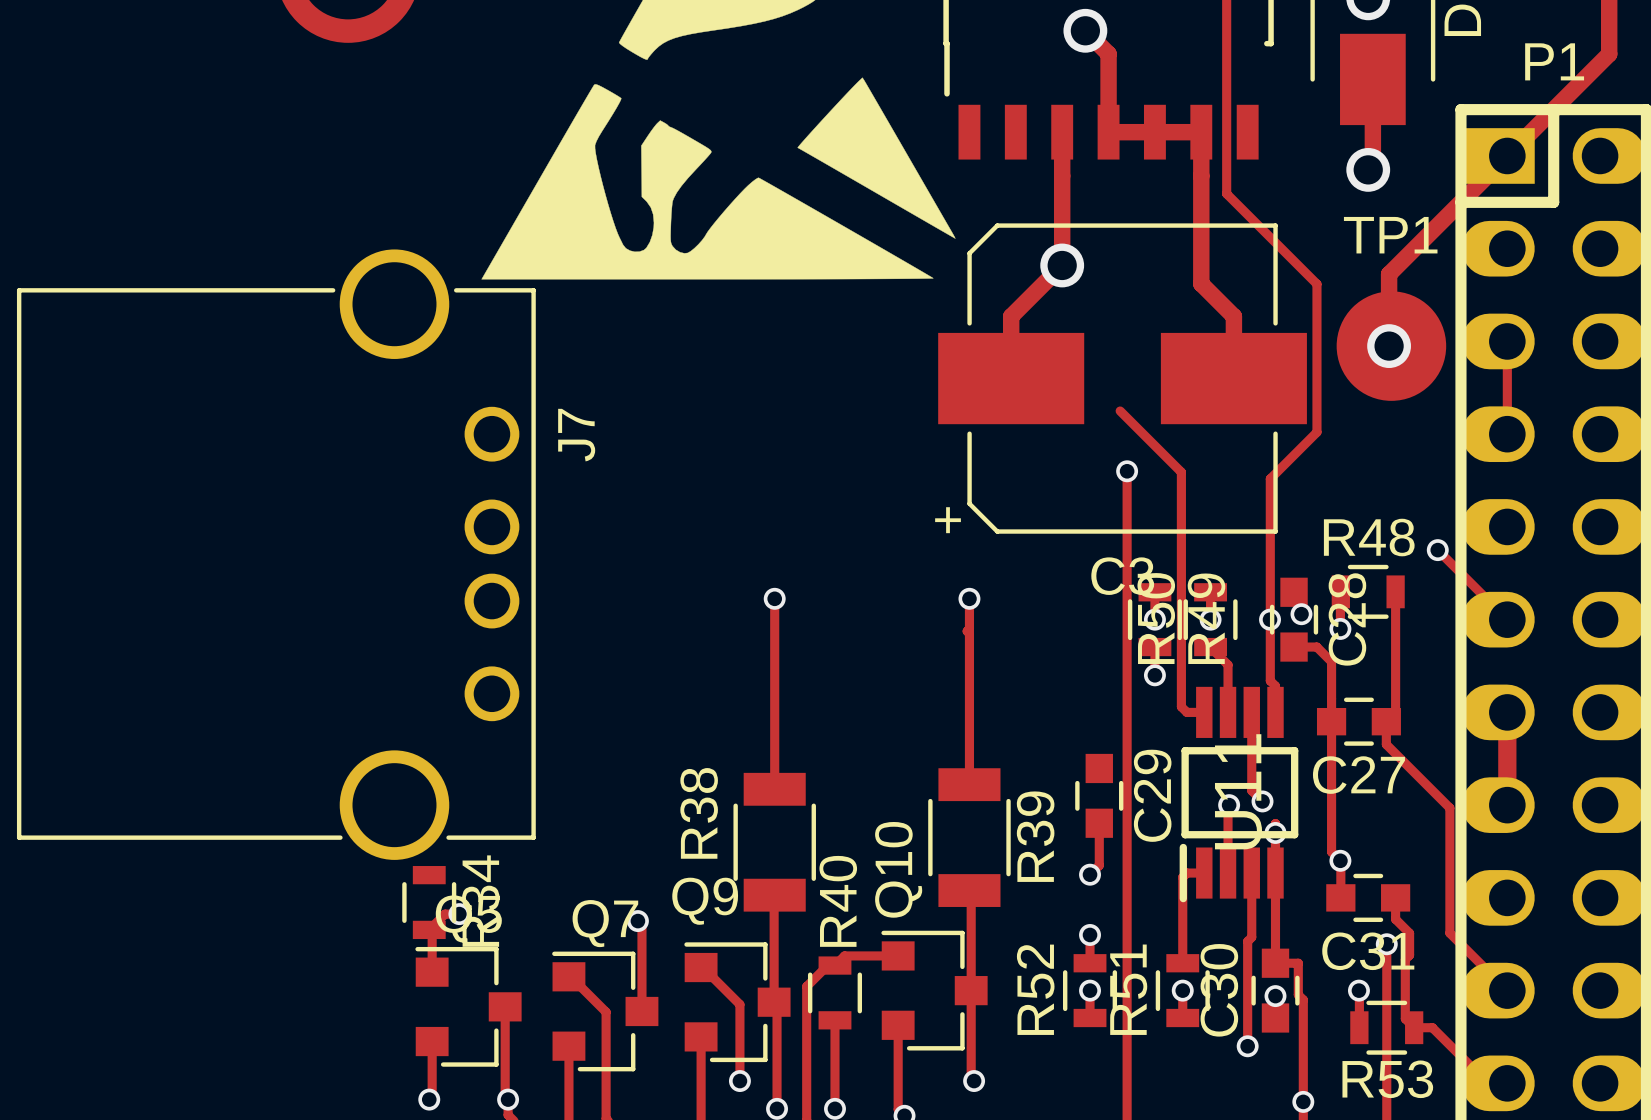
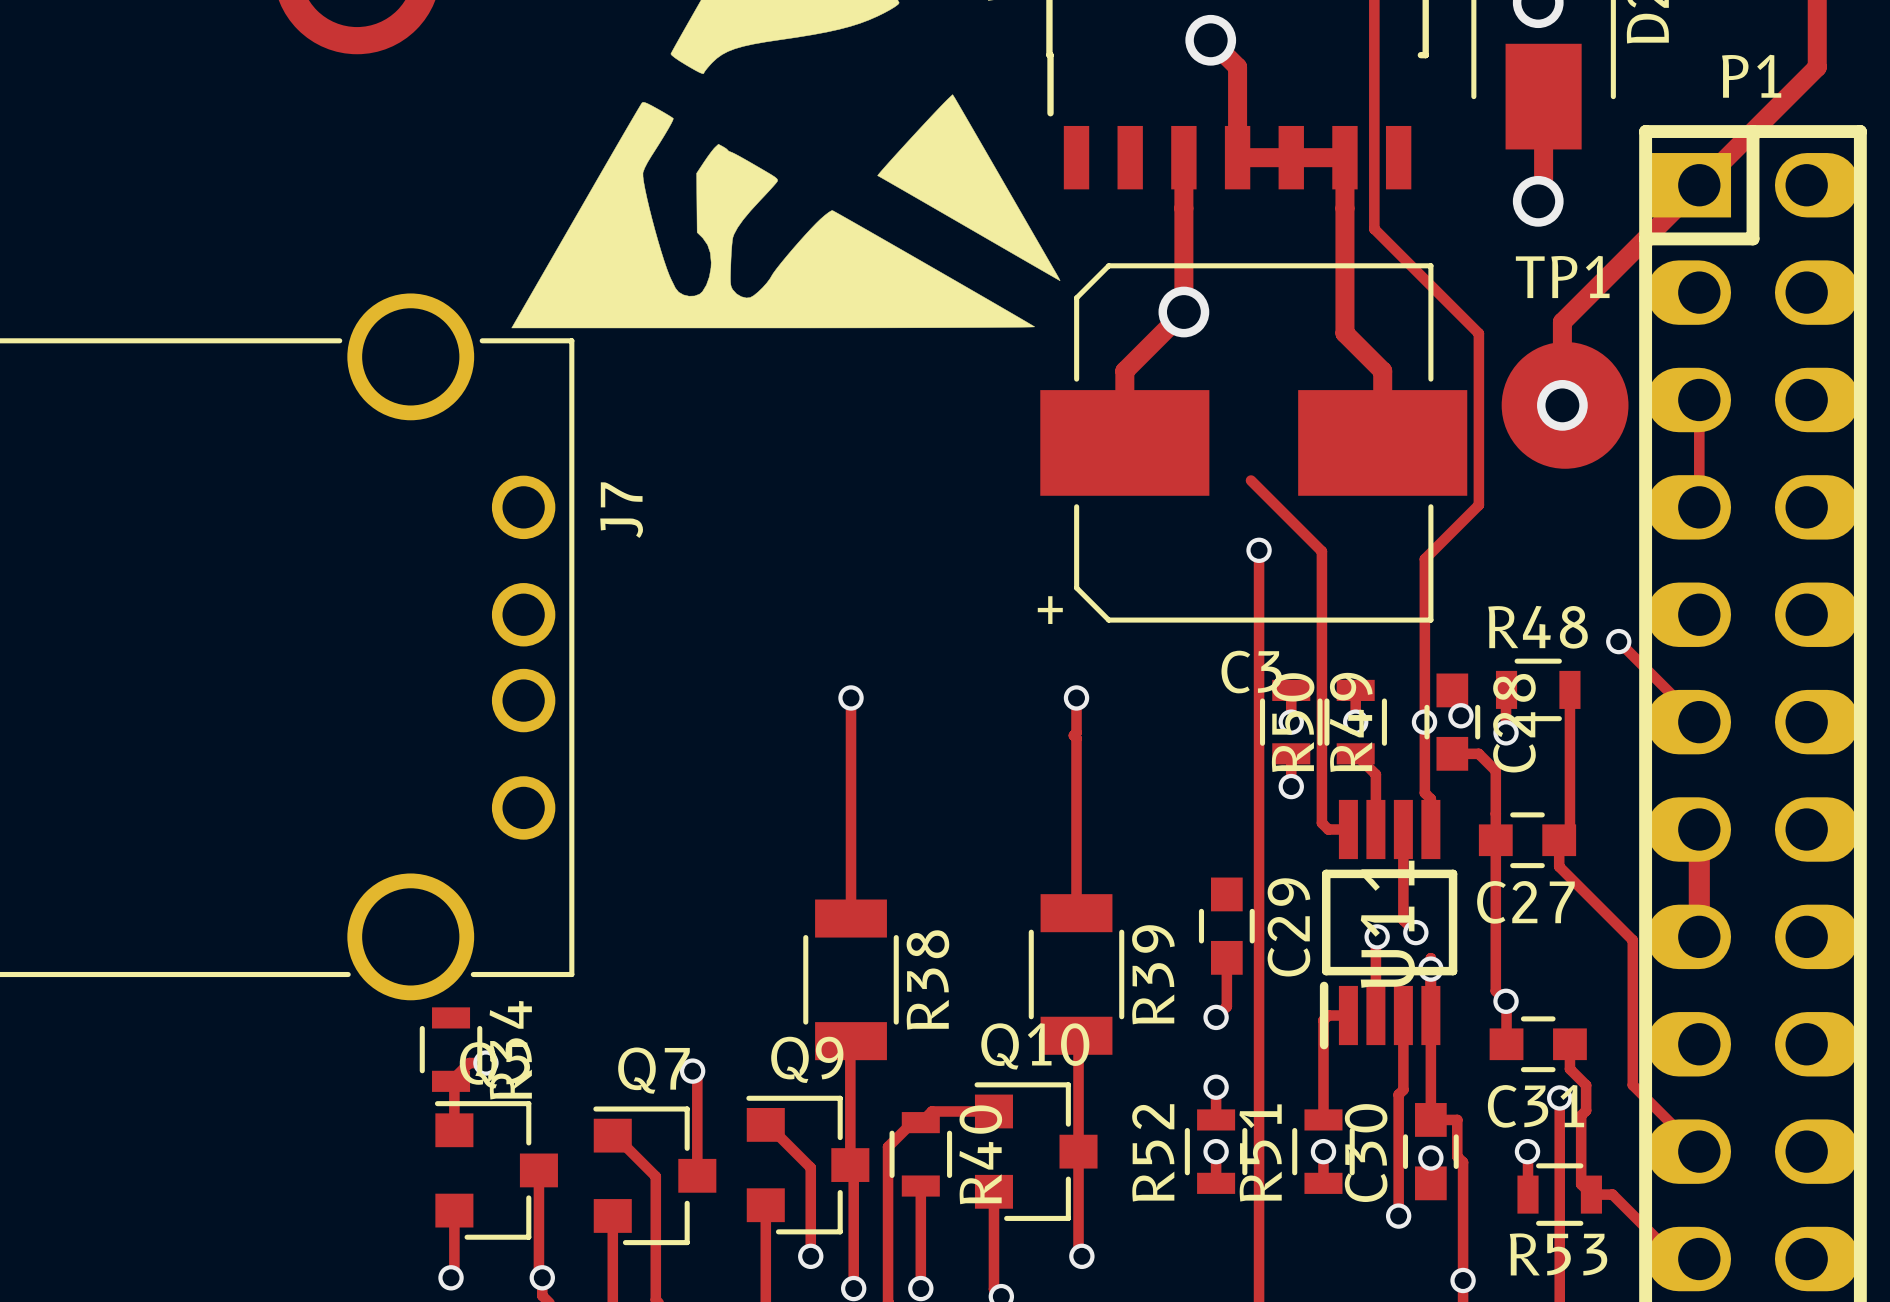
R38 name position: R38 (699, 813) -> R38 (927, 980)
Q10 name rotation: 0° (898, 869) -> 90° clockwise (1035, 1046)
Q9 name position: Q9 (705, 901) -> Q9 (807, 1059)
R40 name position: R40 (838, 901) -> R40 (980, 1154)

